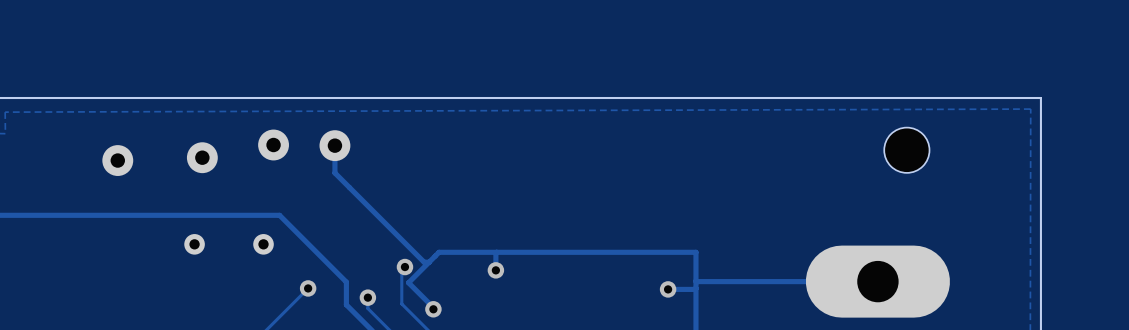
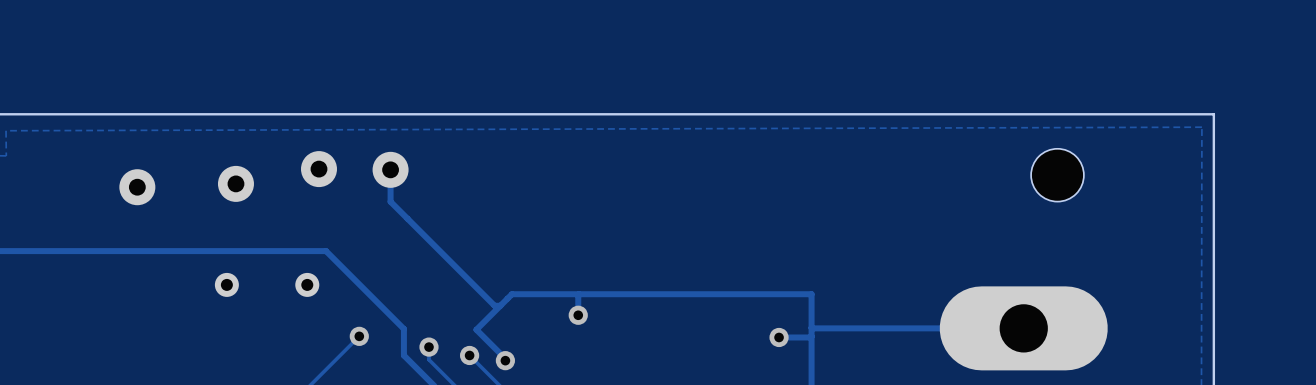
track: (404, 267) (401, 270) (402, 304) -> none
via position: (404, 267) -> (469, 355)

